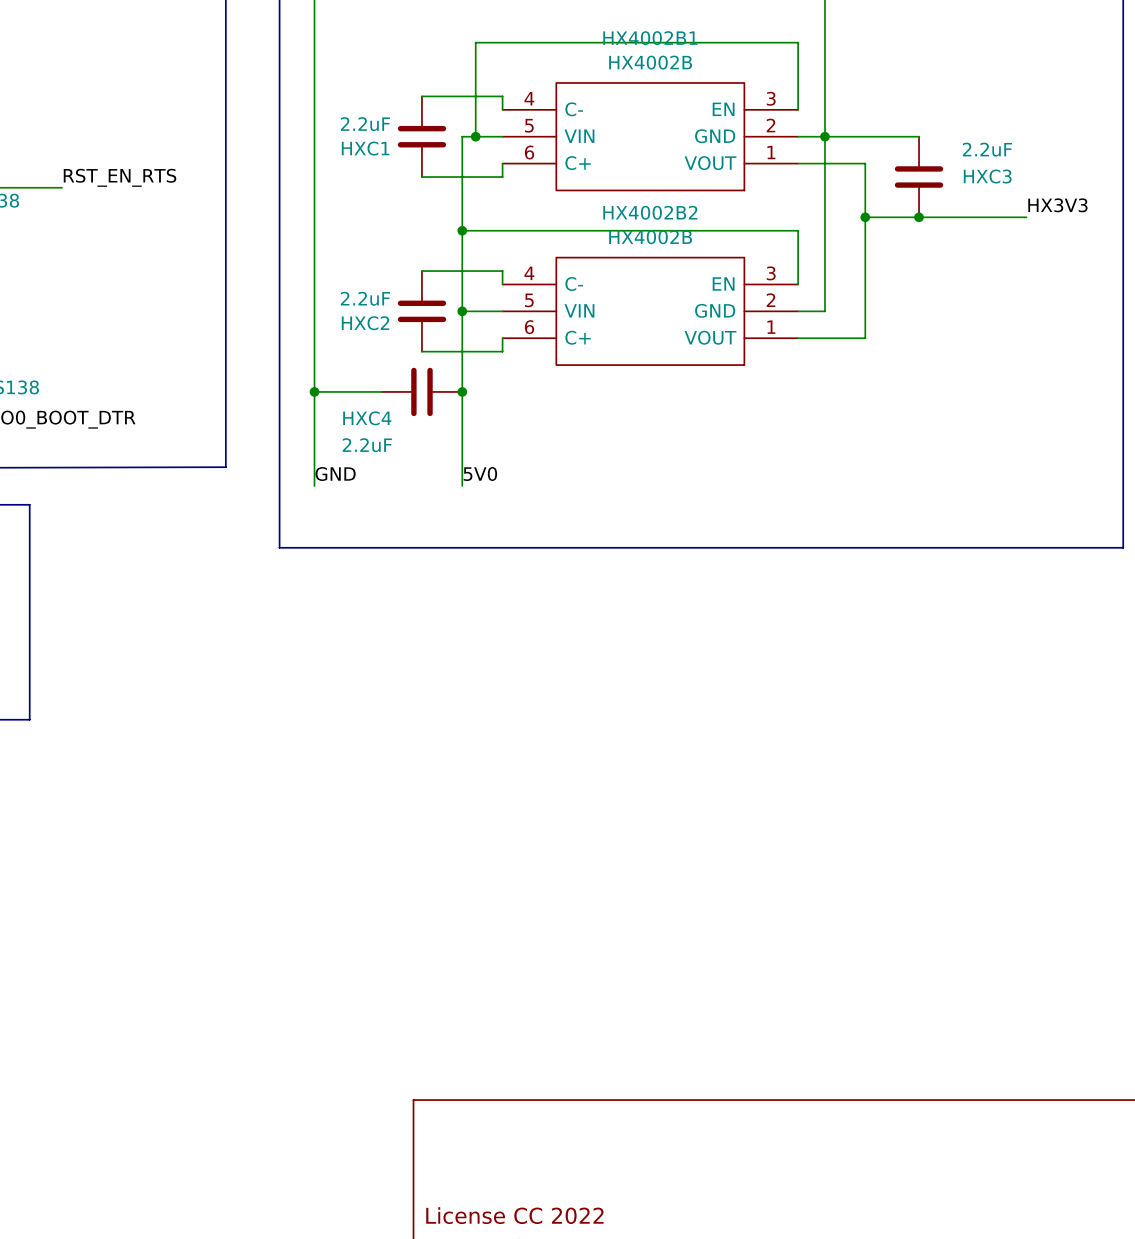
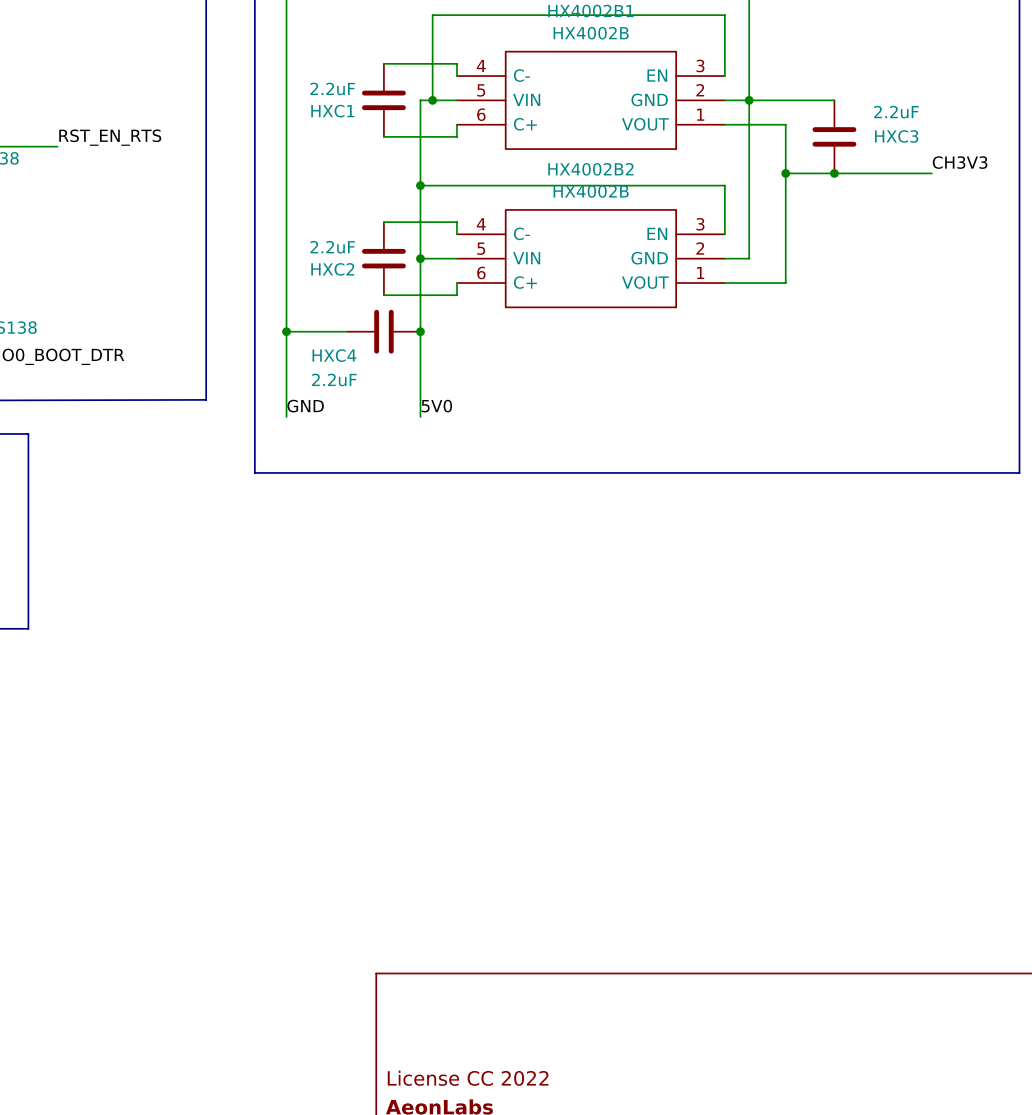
label: HX3V3 (1057, 205) -> CH3V3 (960, 162)

